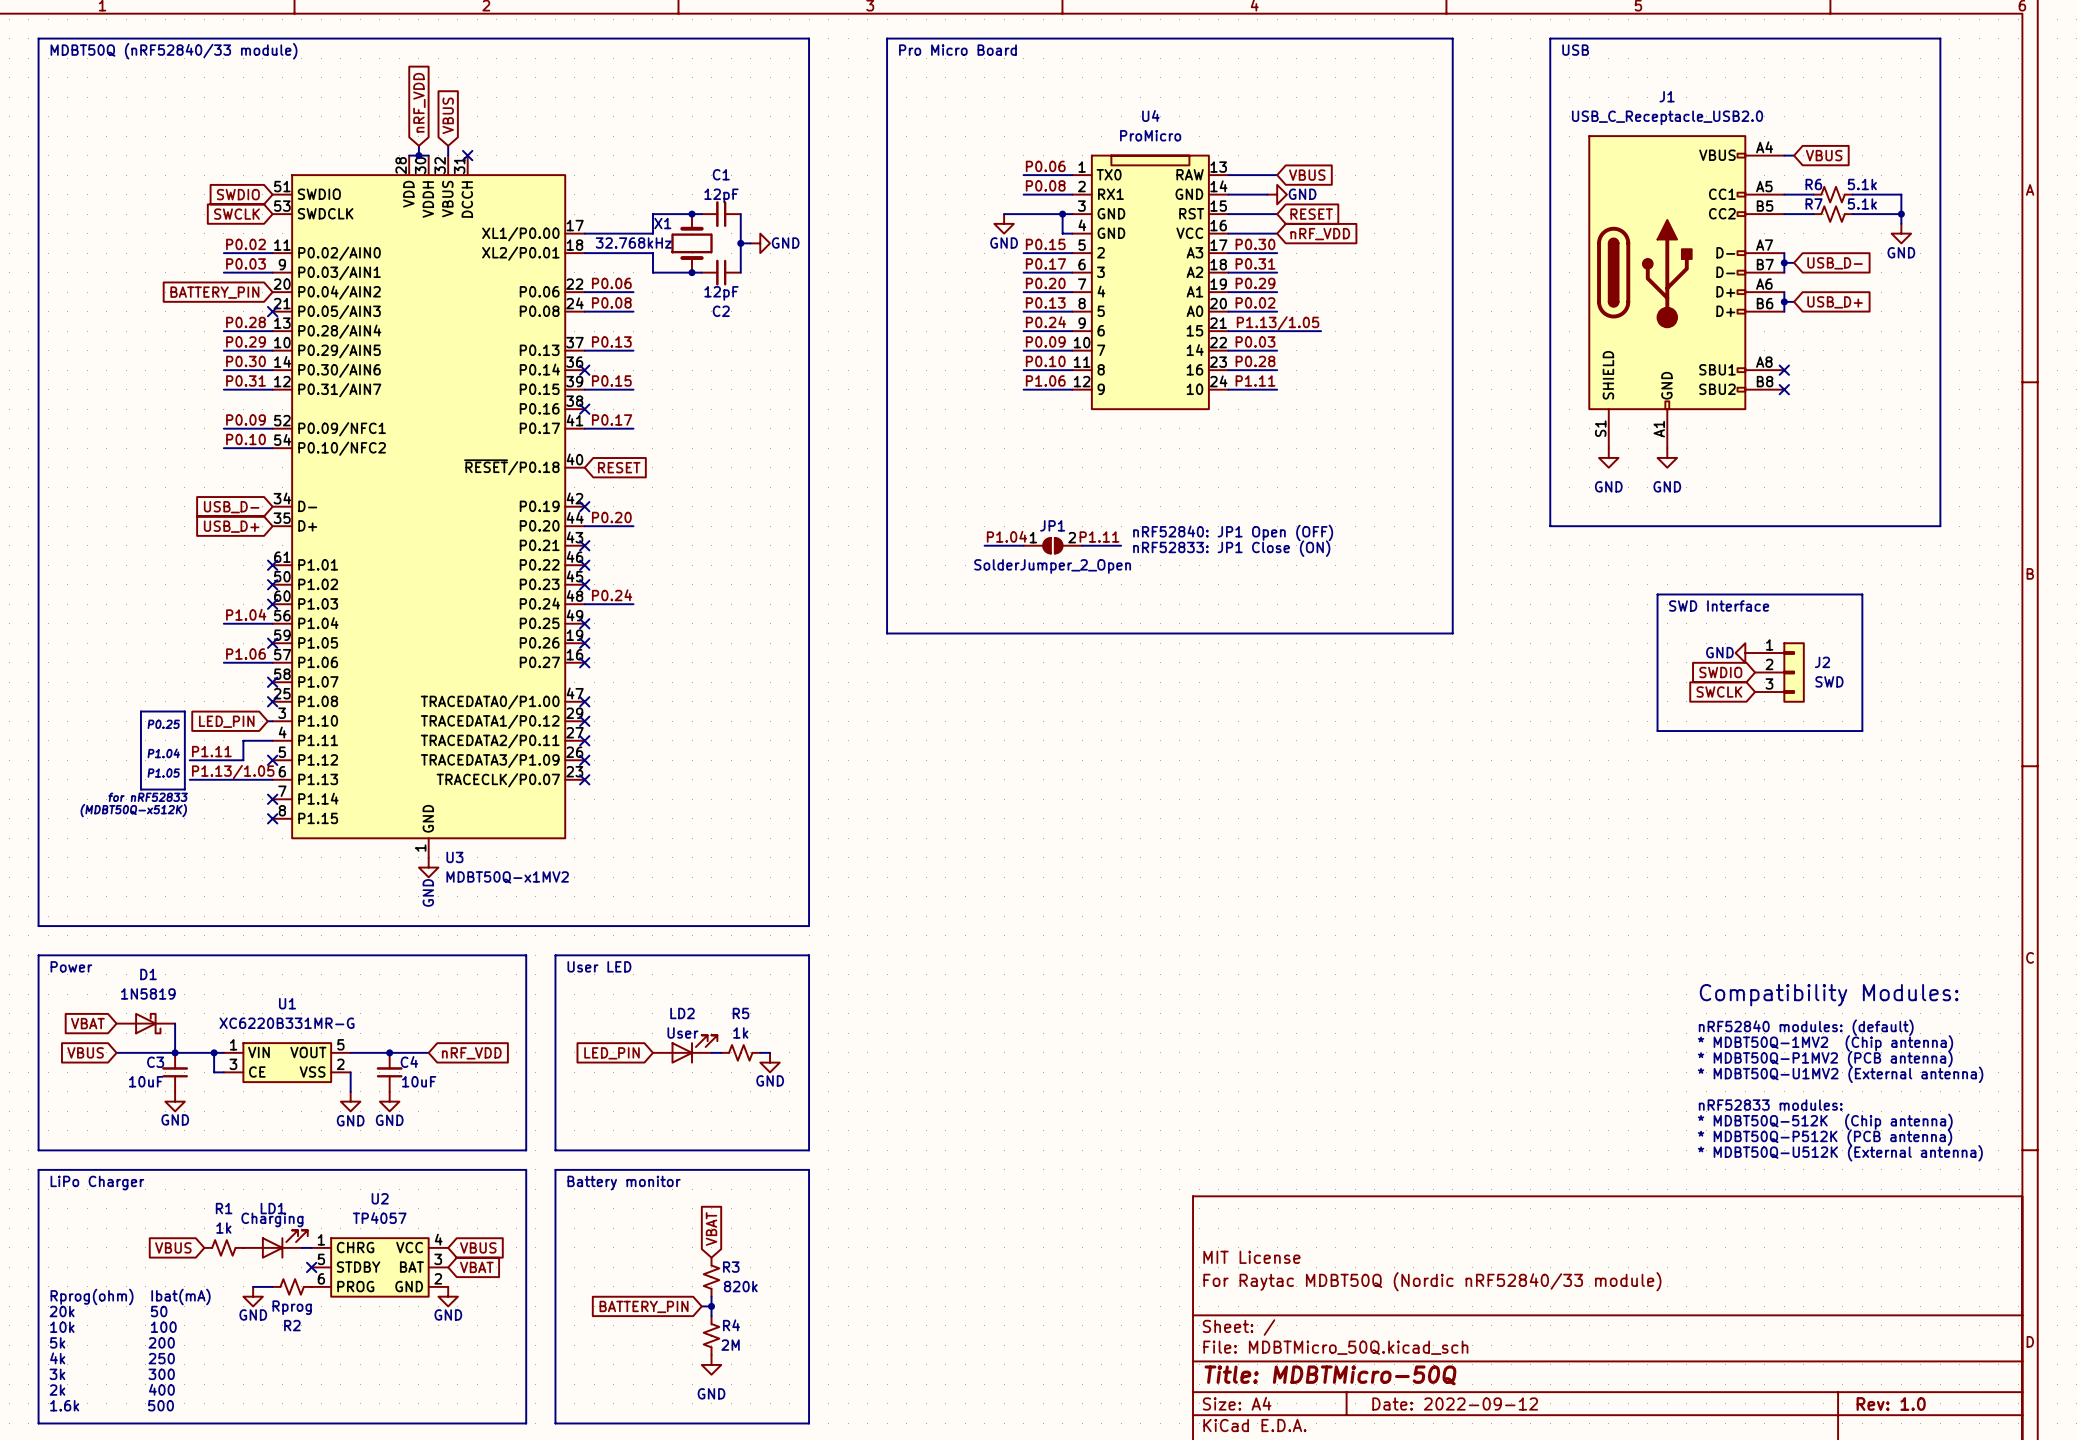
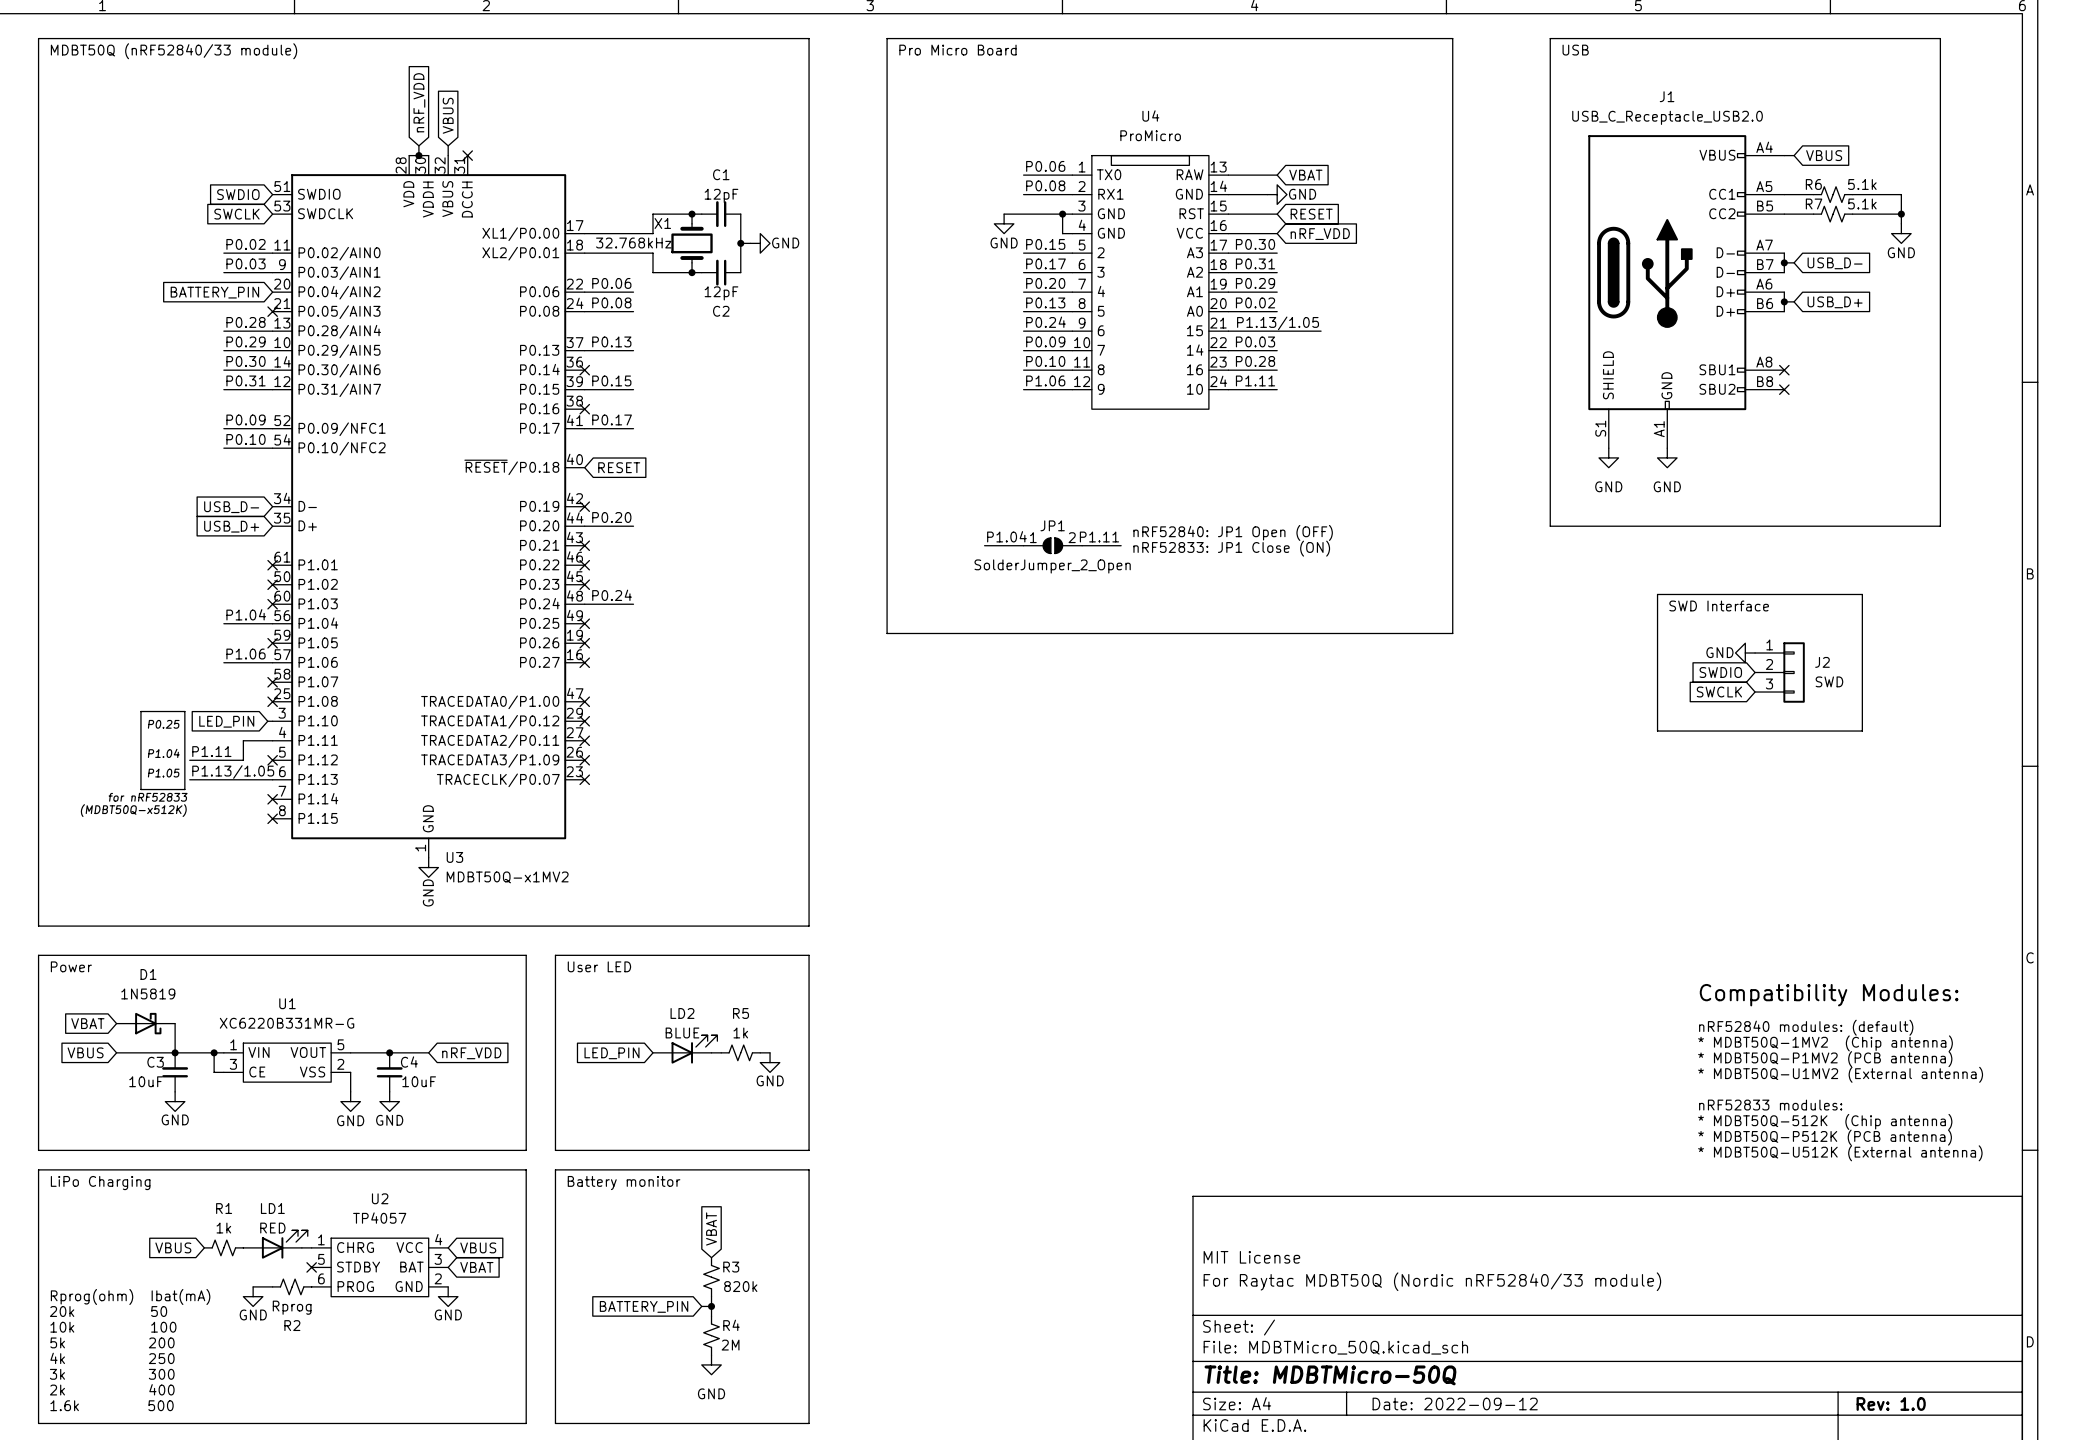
global label: VBUS (1307, 175) -> VBAT (1305, 175)
LD2 value: User (682, 1032) -> BLUE (682, 1032)
text: LiPo Charger (97, 1183) -> LiPo Charging (100, 1183)
LD1 value: Charging (272, 1219) -> RED (272, 1228)

